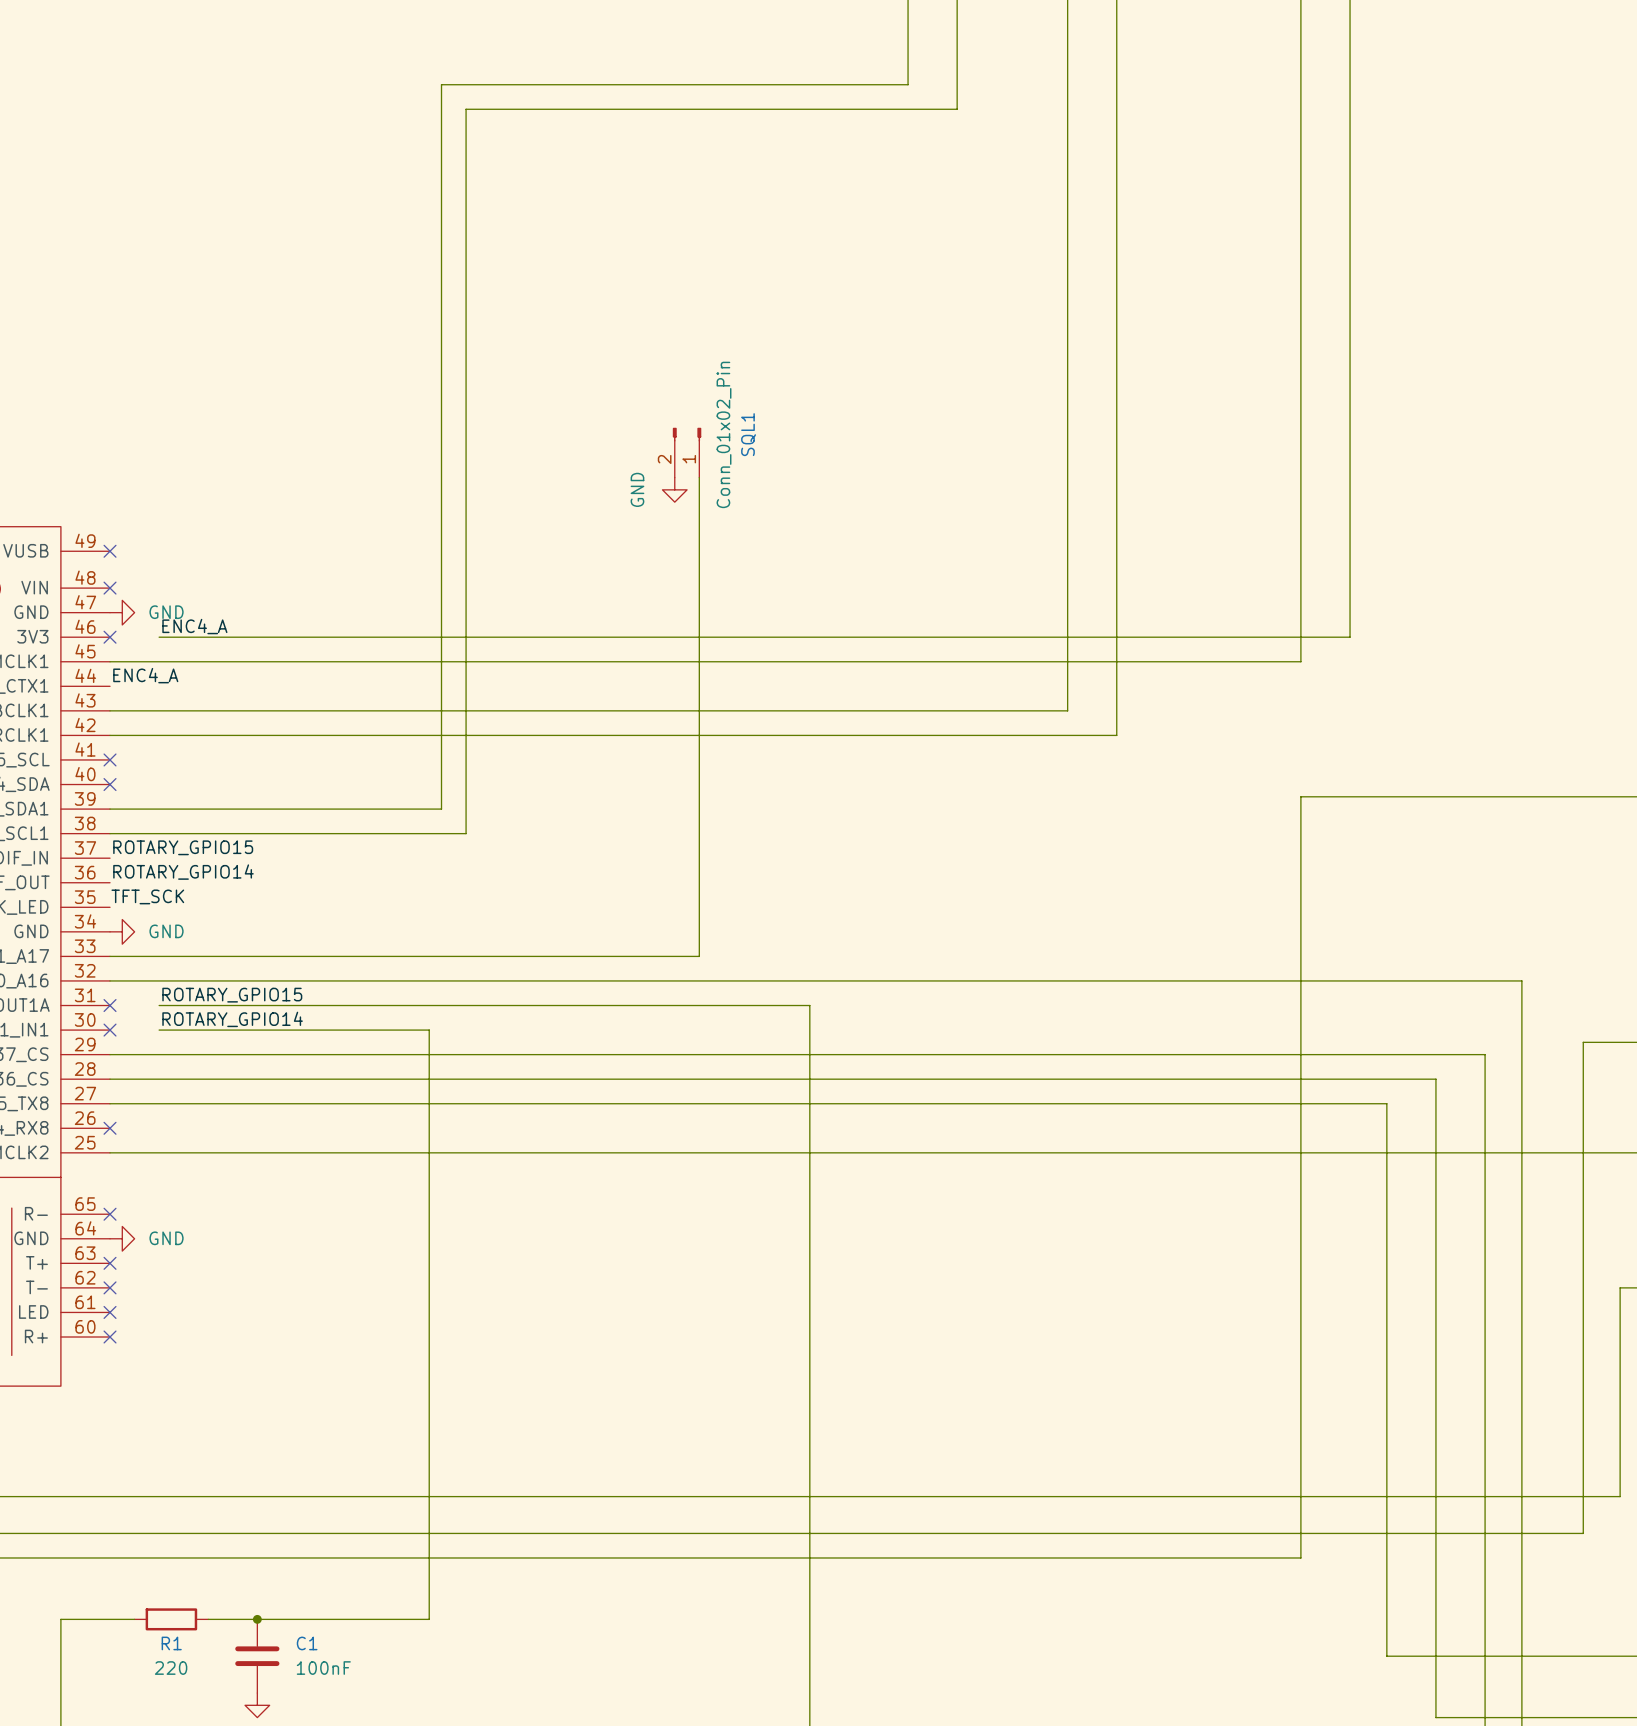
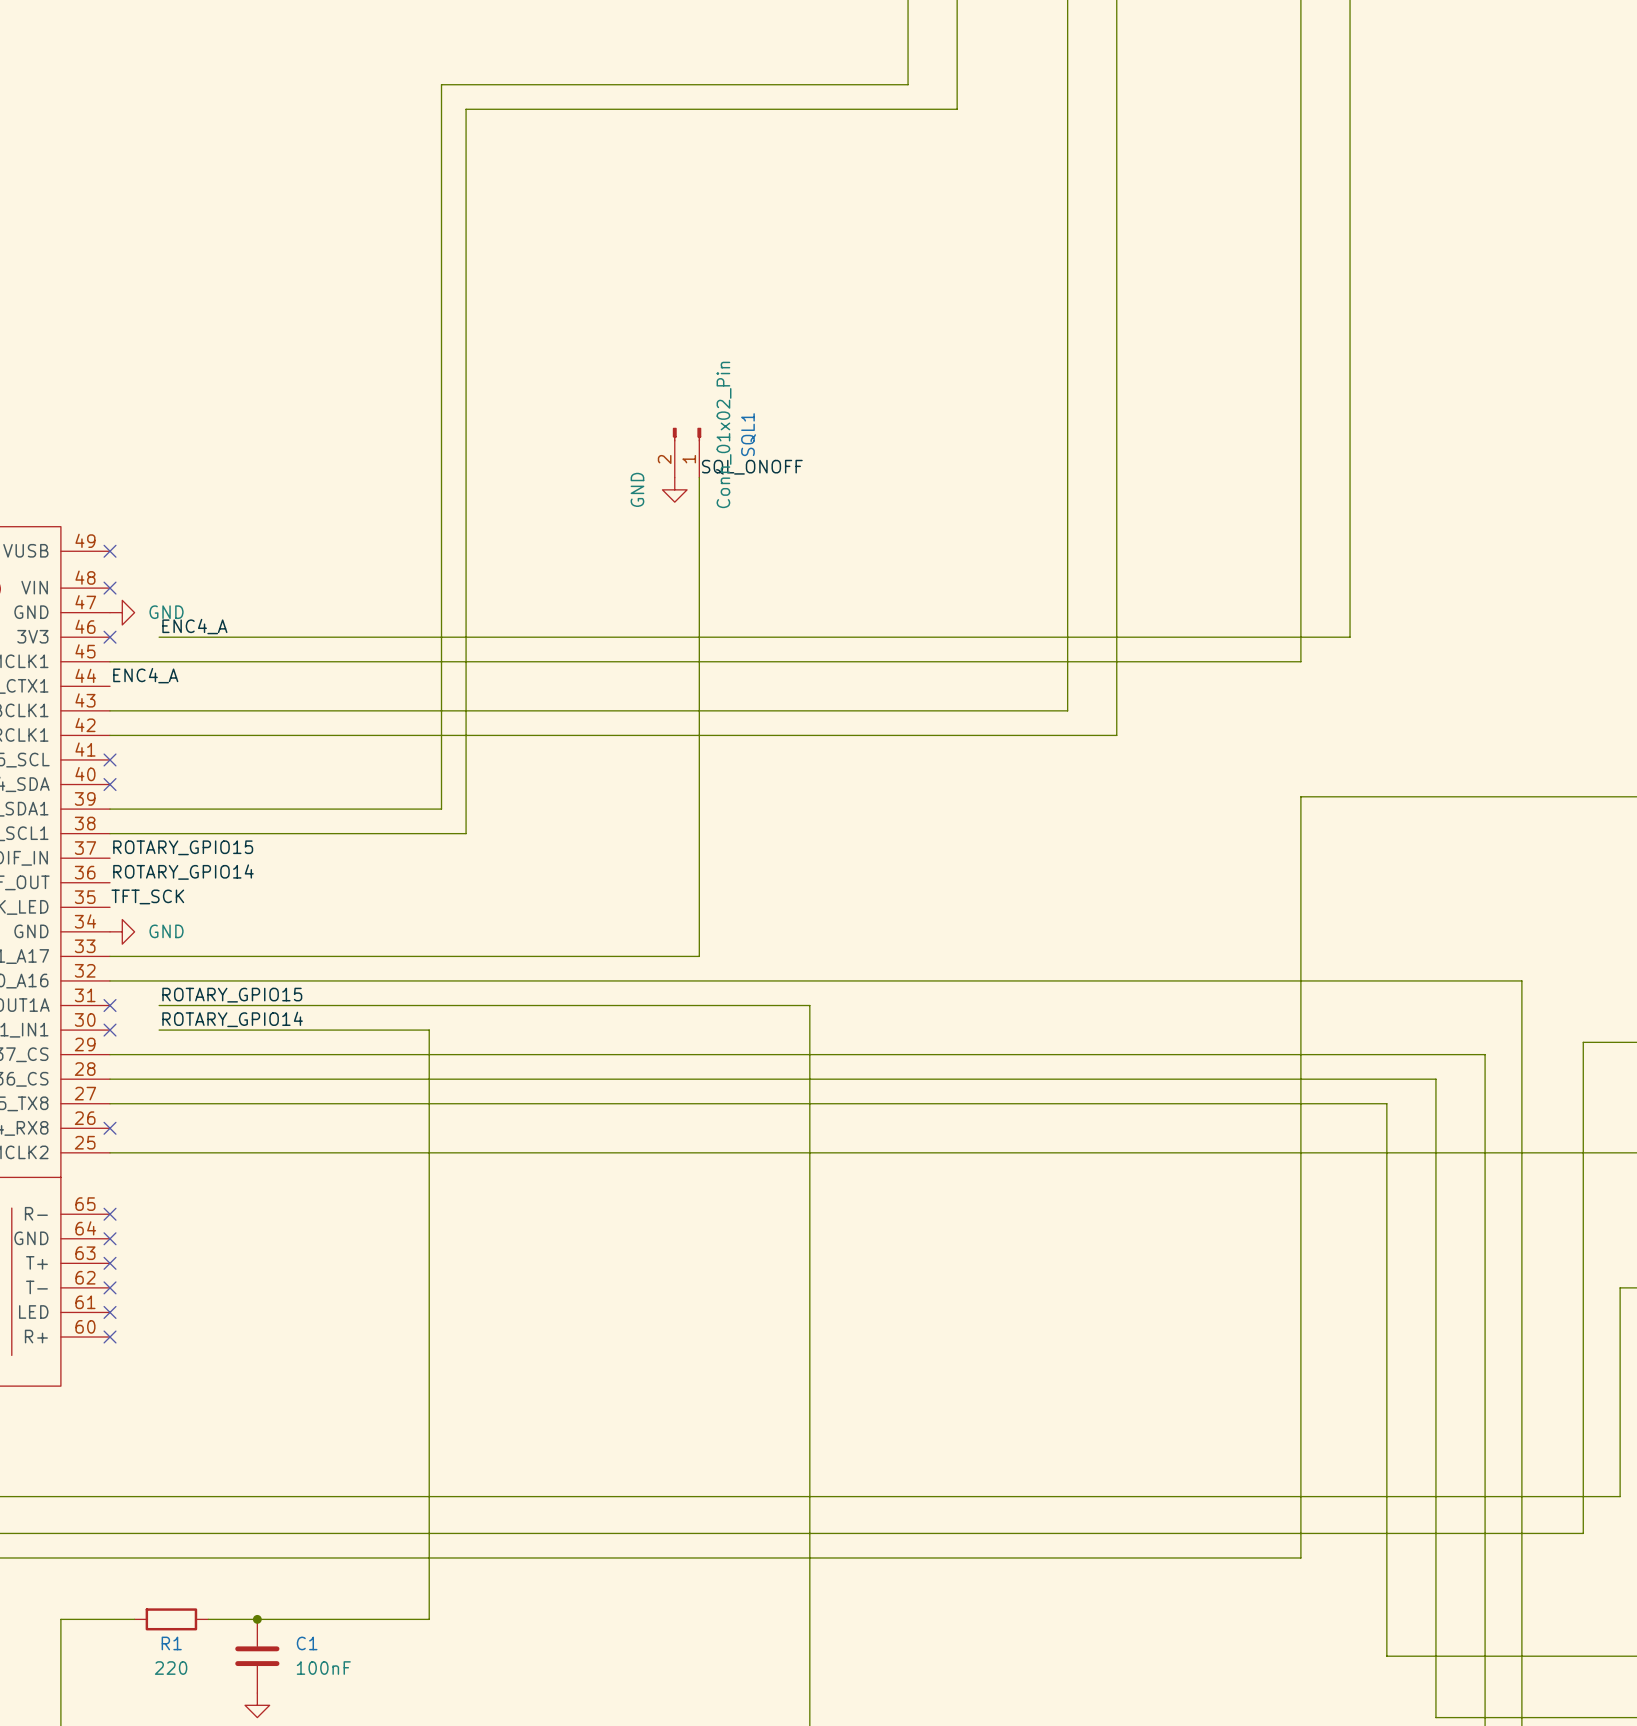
label: none -> SQL_ONOFF (752, 467)
no-connect mark: none -> (110, 1238)
power symbol: GND (122, 1238) -> none

